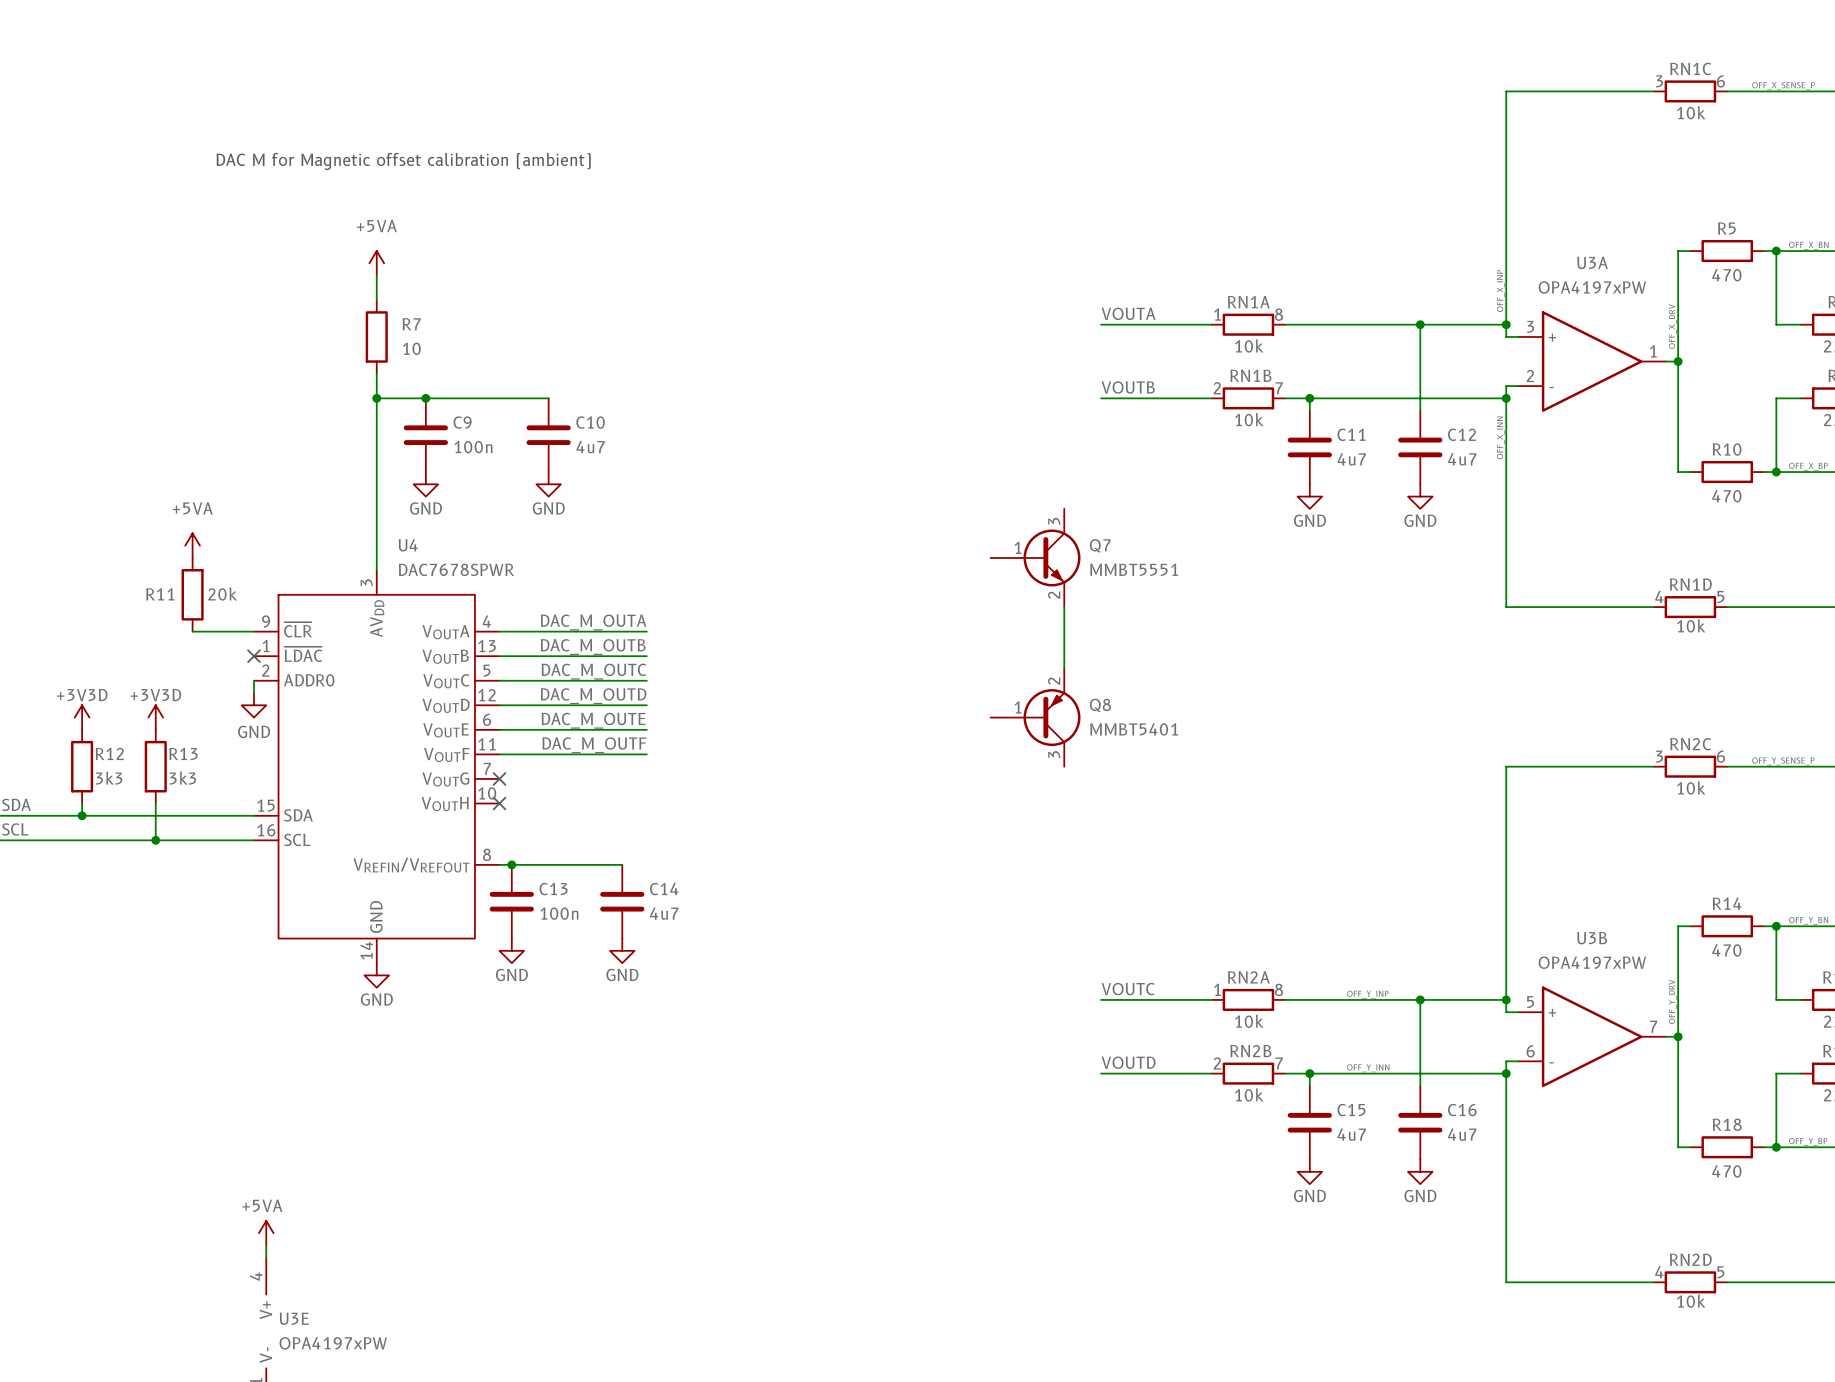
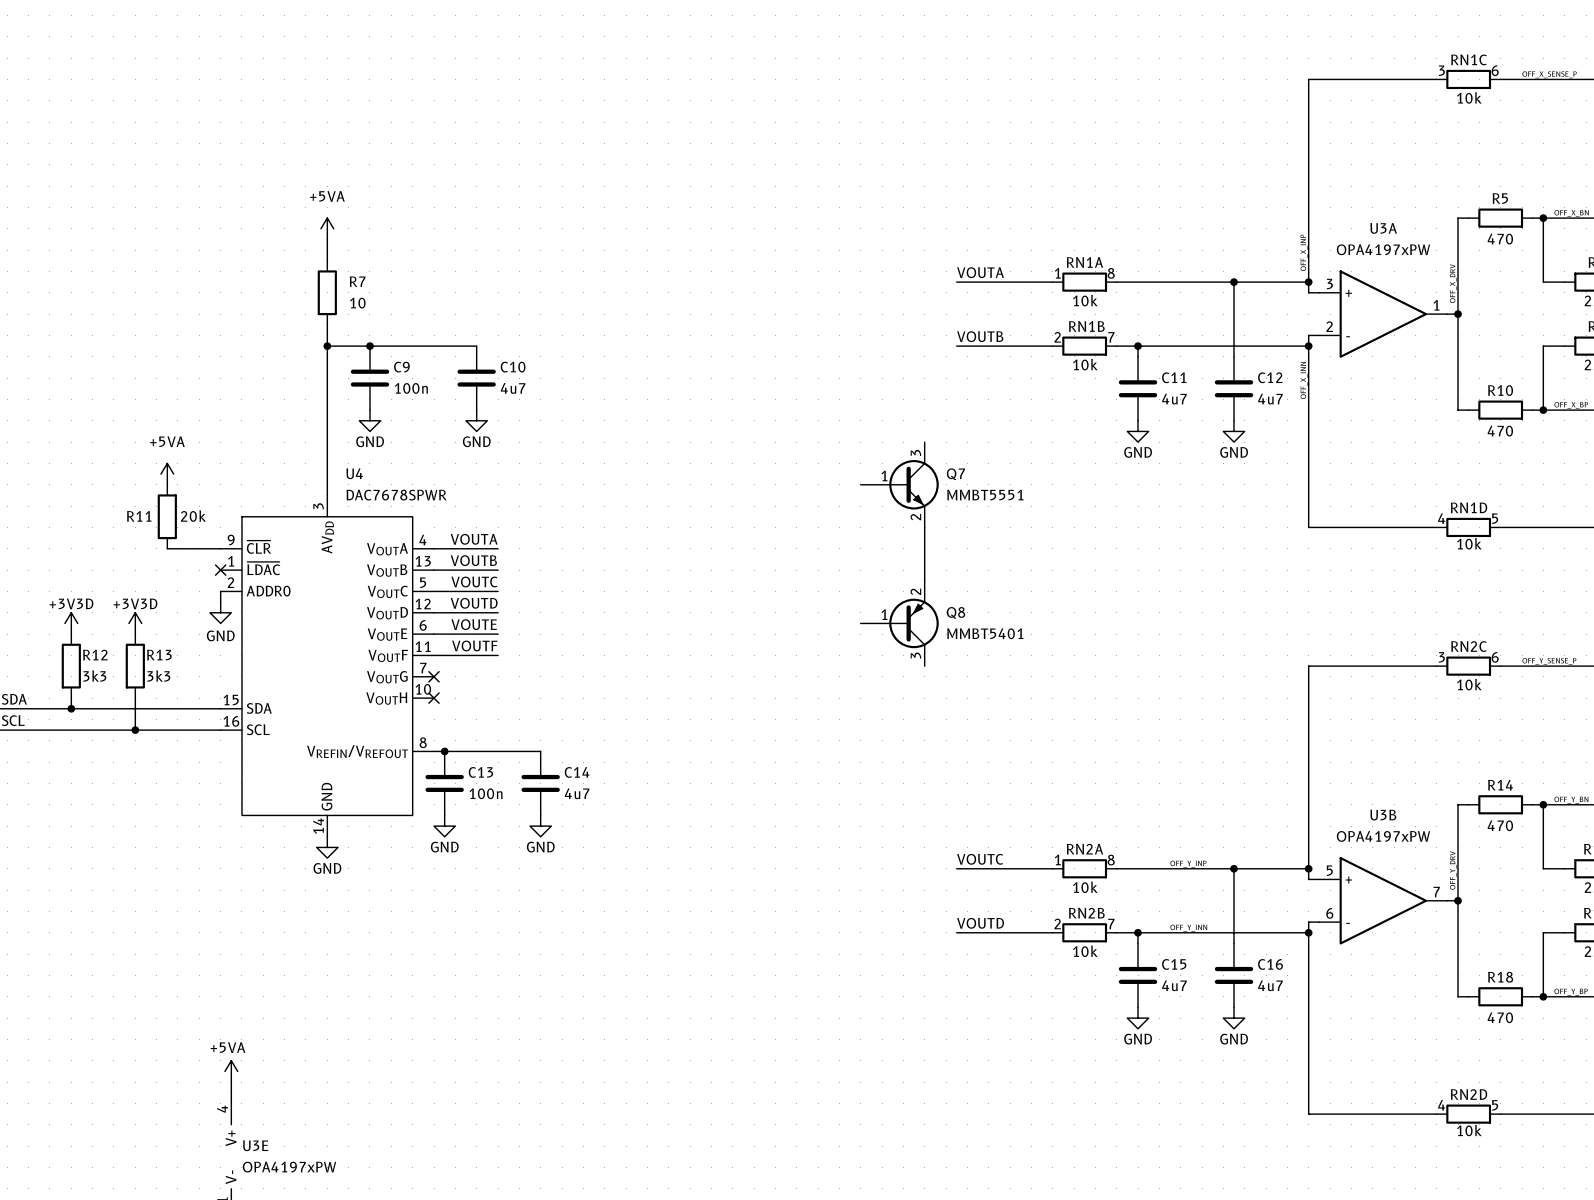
text: DAC M for Magnetic offset calibration (ambient) (403, 161) -> none
label: none -> VOUTA (474, 539)
label: DAC_M_OUTA (593, 622) -> none
wire: (573, 631) (646, 631) -> none
label: none -> VOUTB (473, 560)
label: DAC_M_OUTB (593, 647) -> none
wire: (573, 656) (646, 656) -> none
label: none -> VOUTC (474, 581)
label: DAC_M_OUTC (593, 671) -> none
wire: (573, 680) (646, 680) -> none
label: none -> VOUTD (474, 603)
label: DAC_M_OUTD (593, 696) -> none
wire: (573, 705) (646, 705) -> none
label: none -> VOUTE (474, 624)
label: DAC_M_OUTE (593, 720) -> none
wire: (573, 729) (646, 729) -> none
label: none -> VOUTF (474, 645)
label: DAC_M_OUTF (594, 745) -> none
wire: (573, 754) (646, 754) -> none

